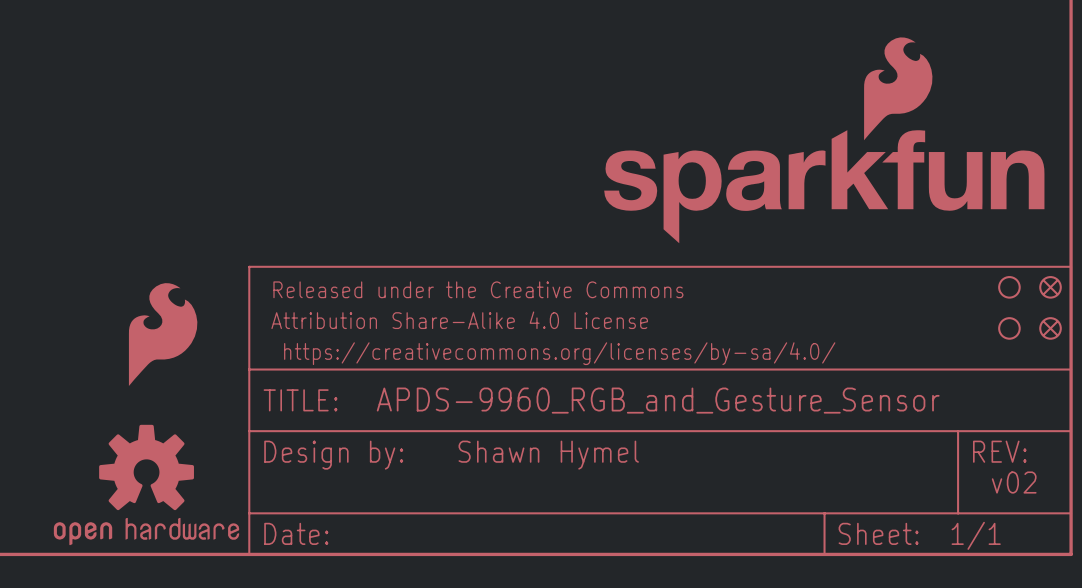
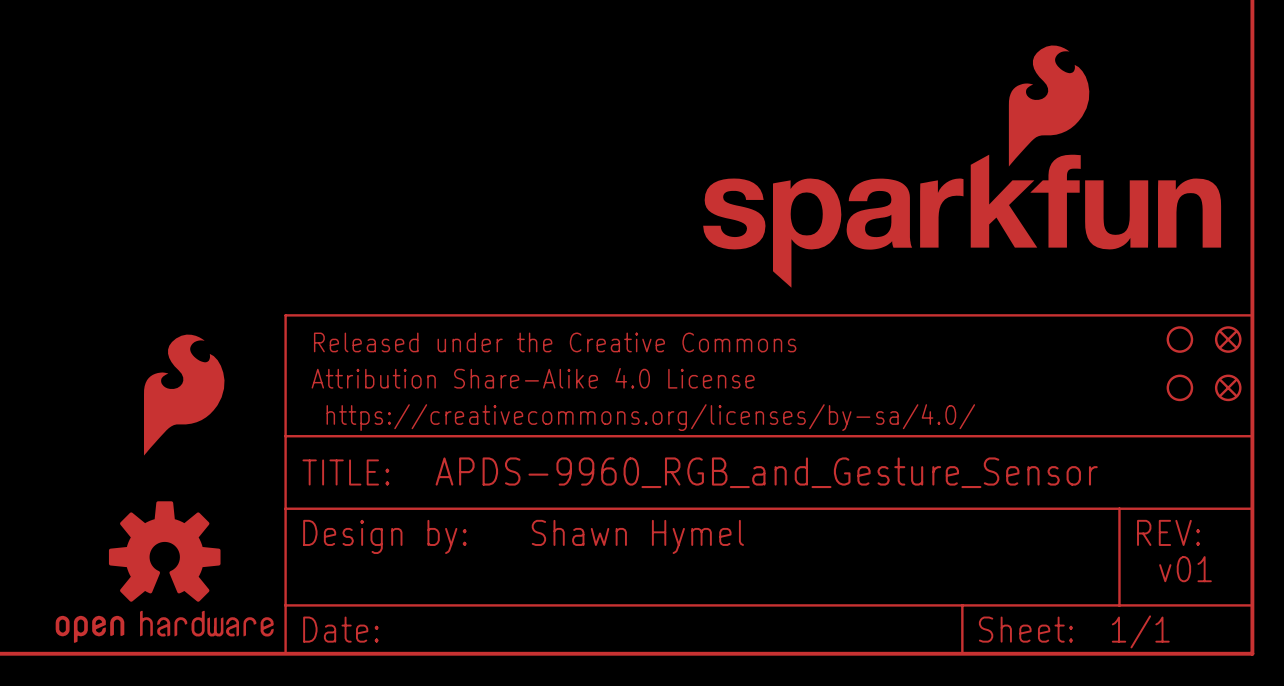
text: v02 (1014, 482) -> v01 (1185, 569)

